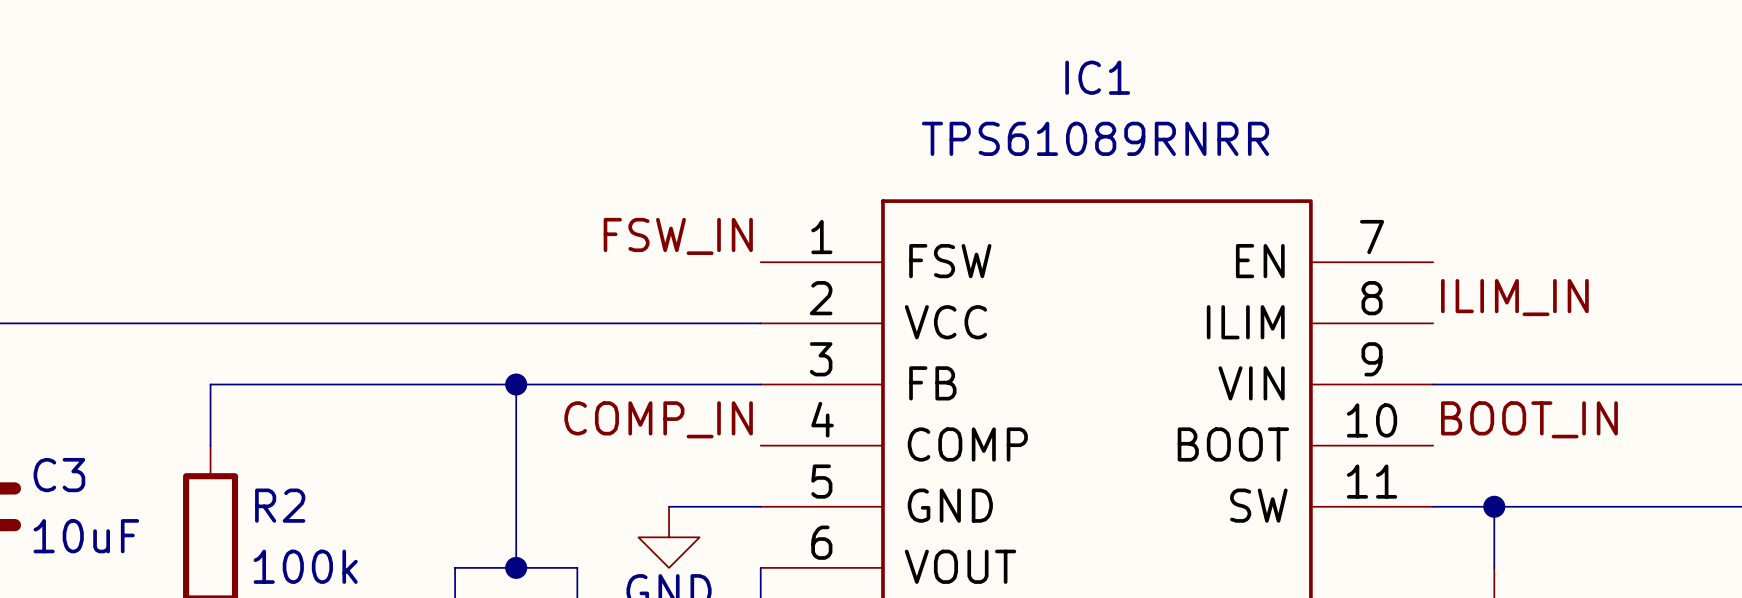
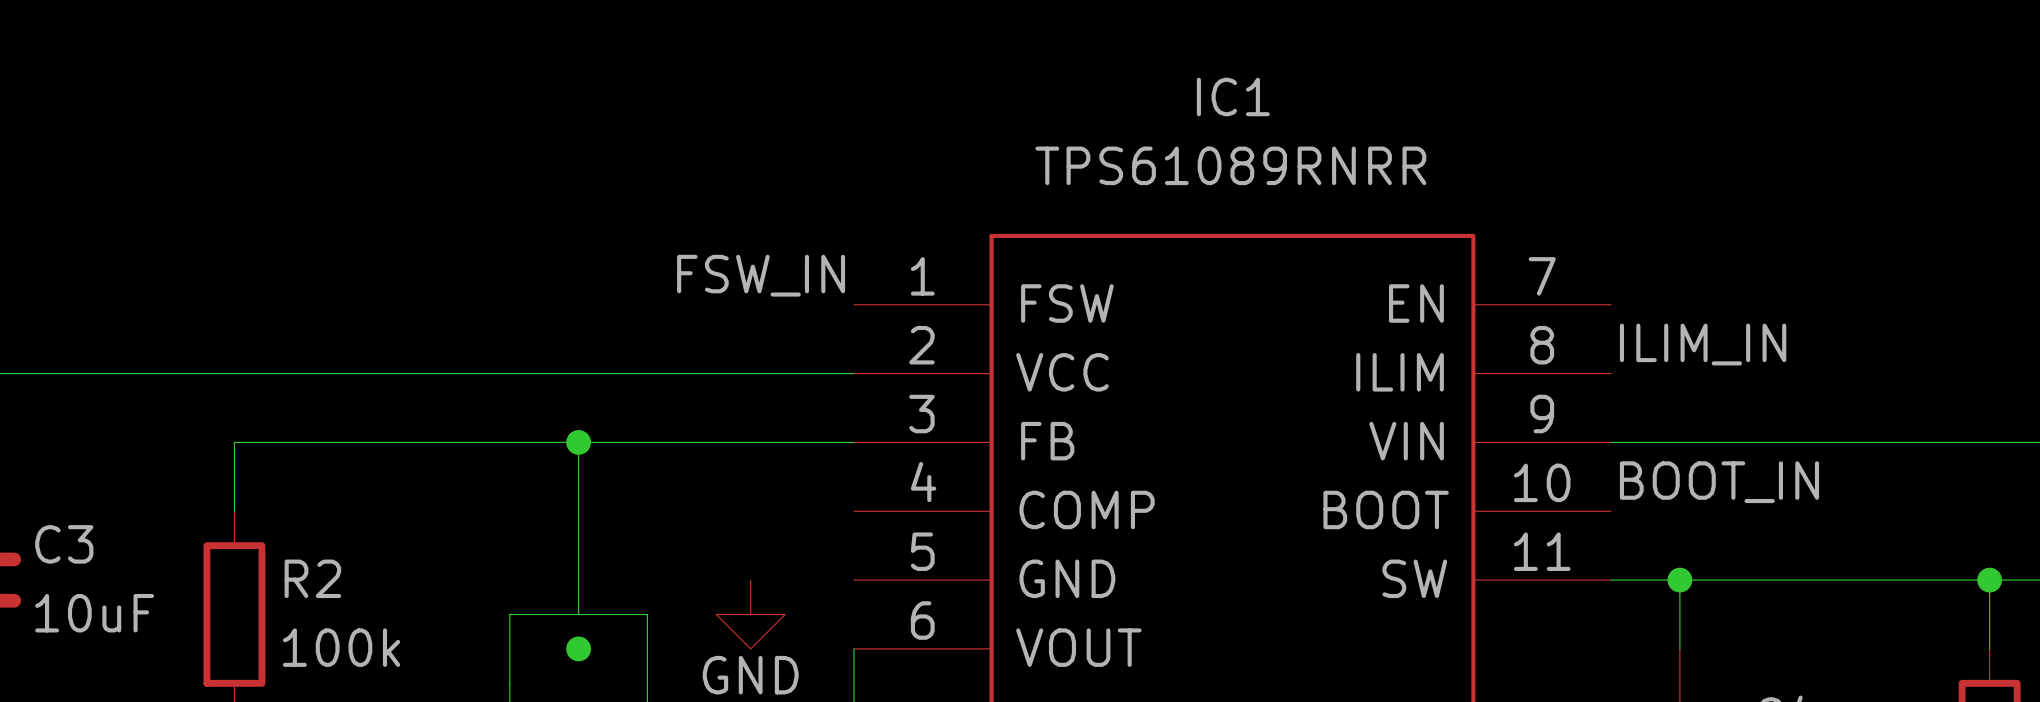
label: COMP_IN (658, 419) -> none
wire: (669, 506) (760, 506) -> none
wire: (516, 537) (516, 567) -> none
wire: (455, 567) (577, 567) -> (509, 648) (509, 614) (647, 614) (647, 648)

